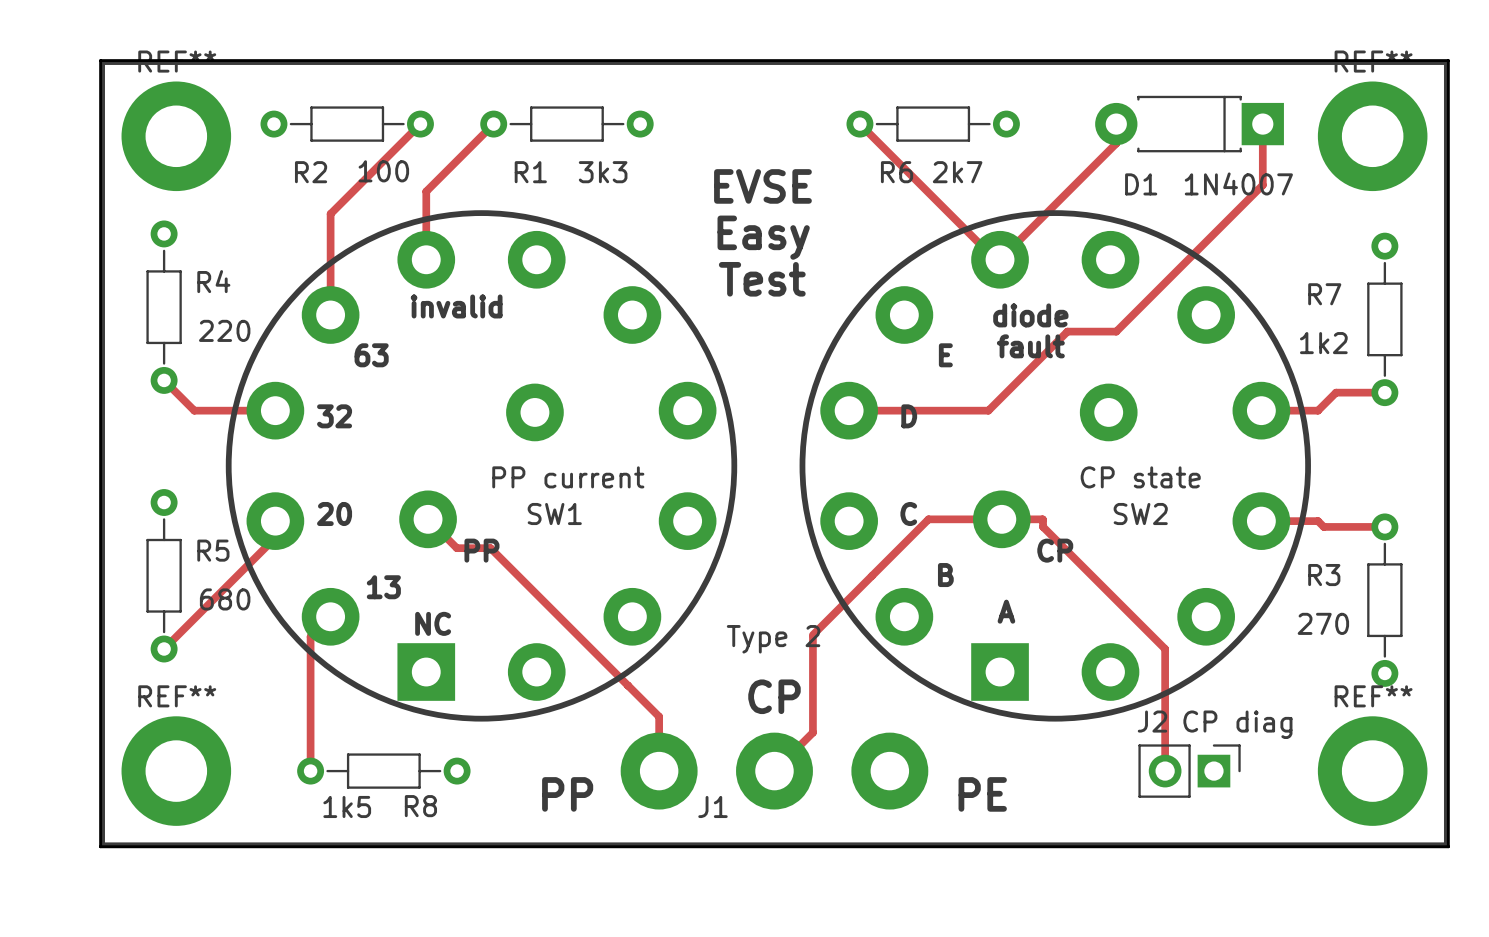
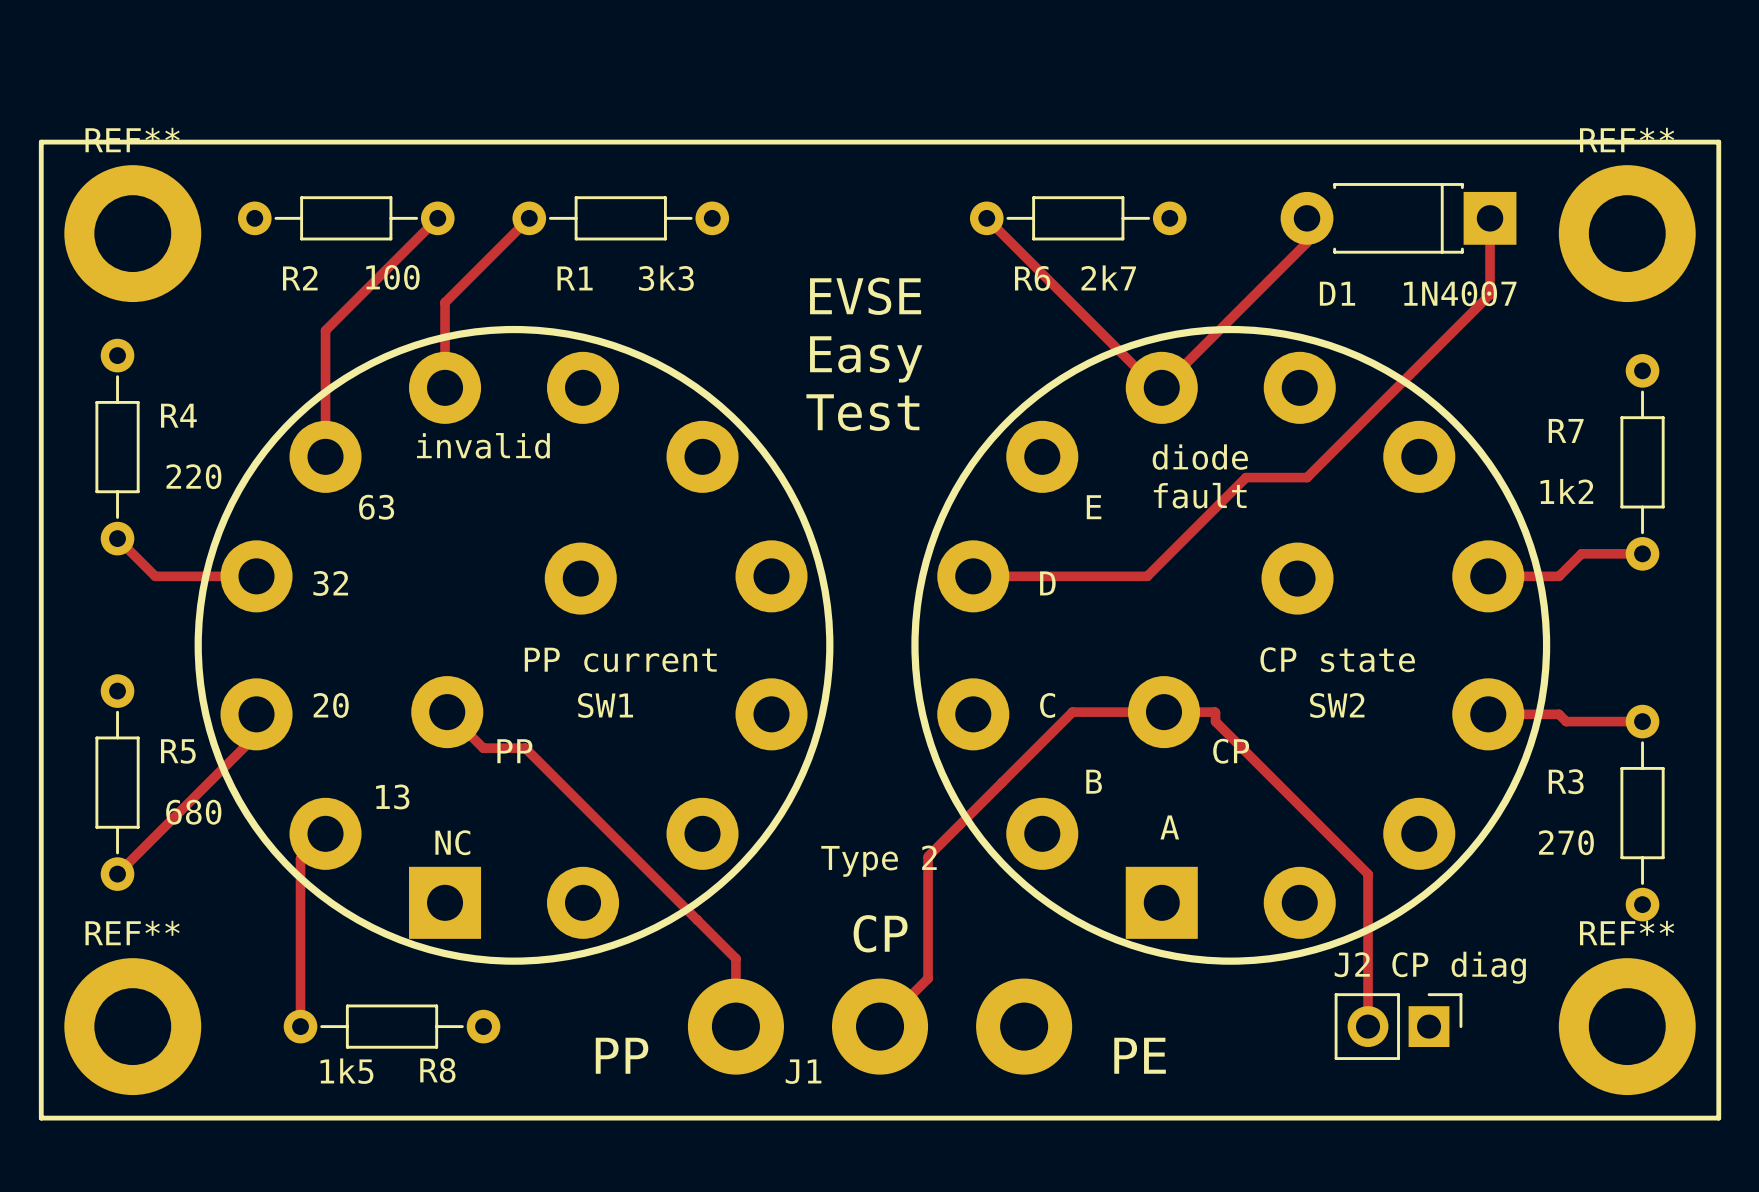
board edge: (100, 60) (100, 846) (1448, 846) (1448, 60) (100, 60) -> none

